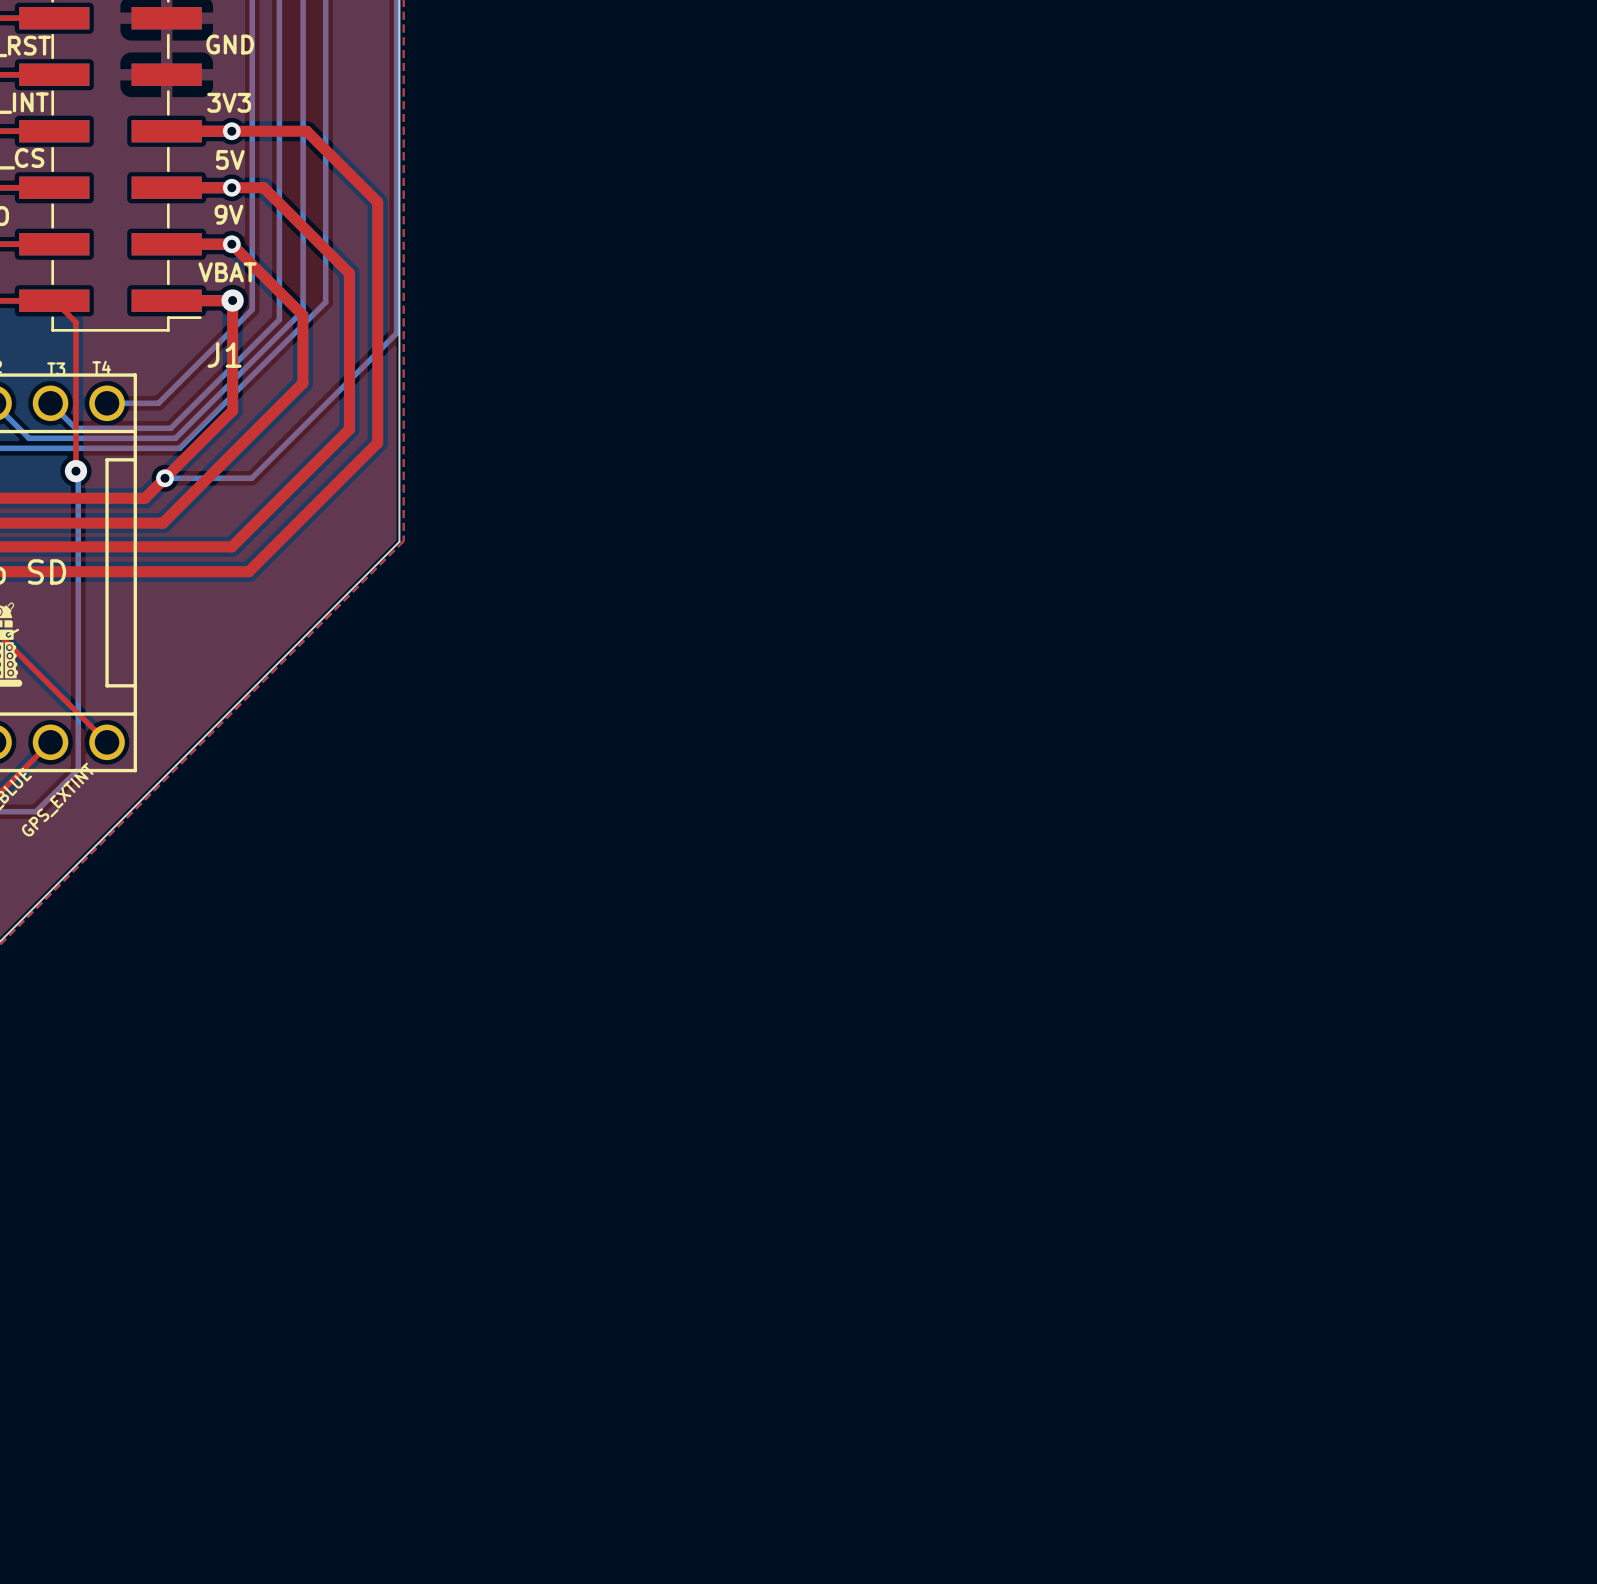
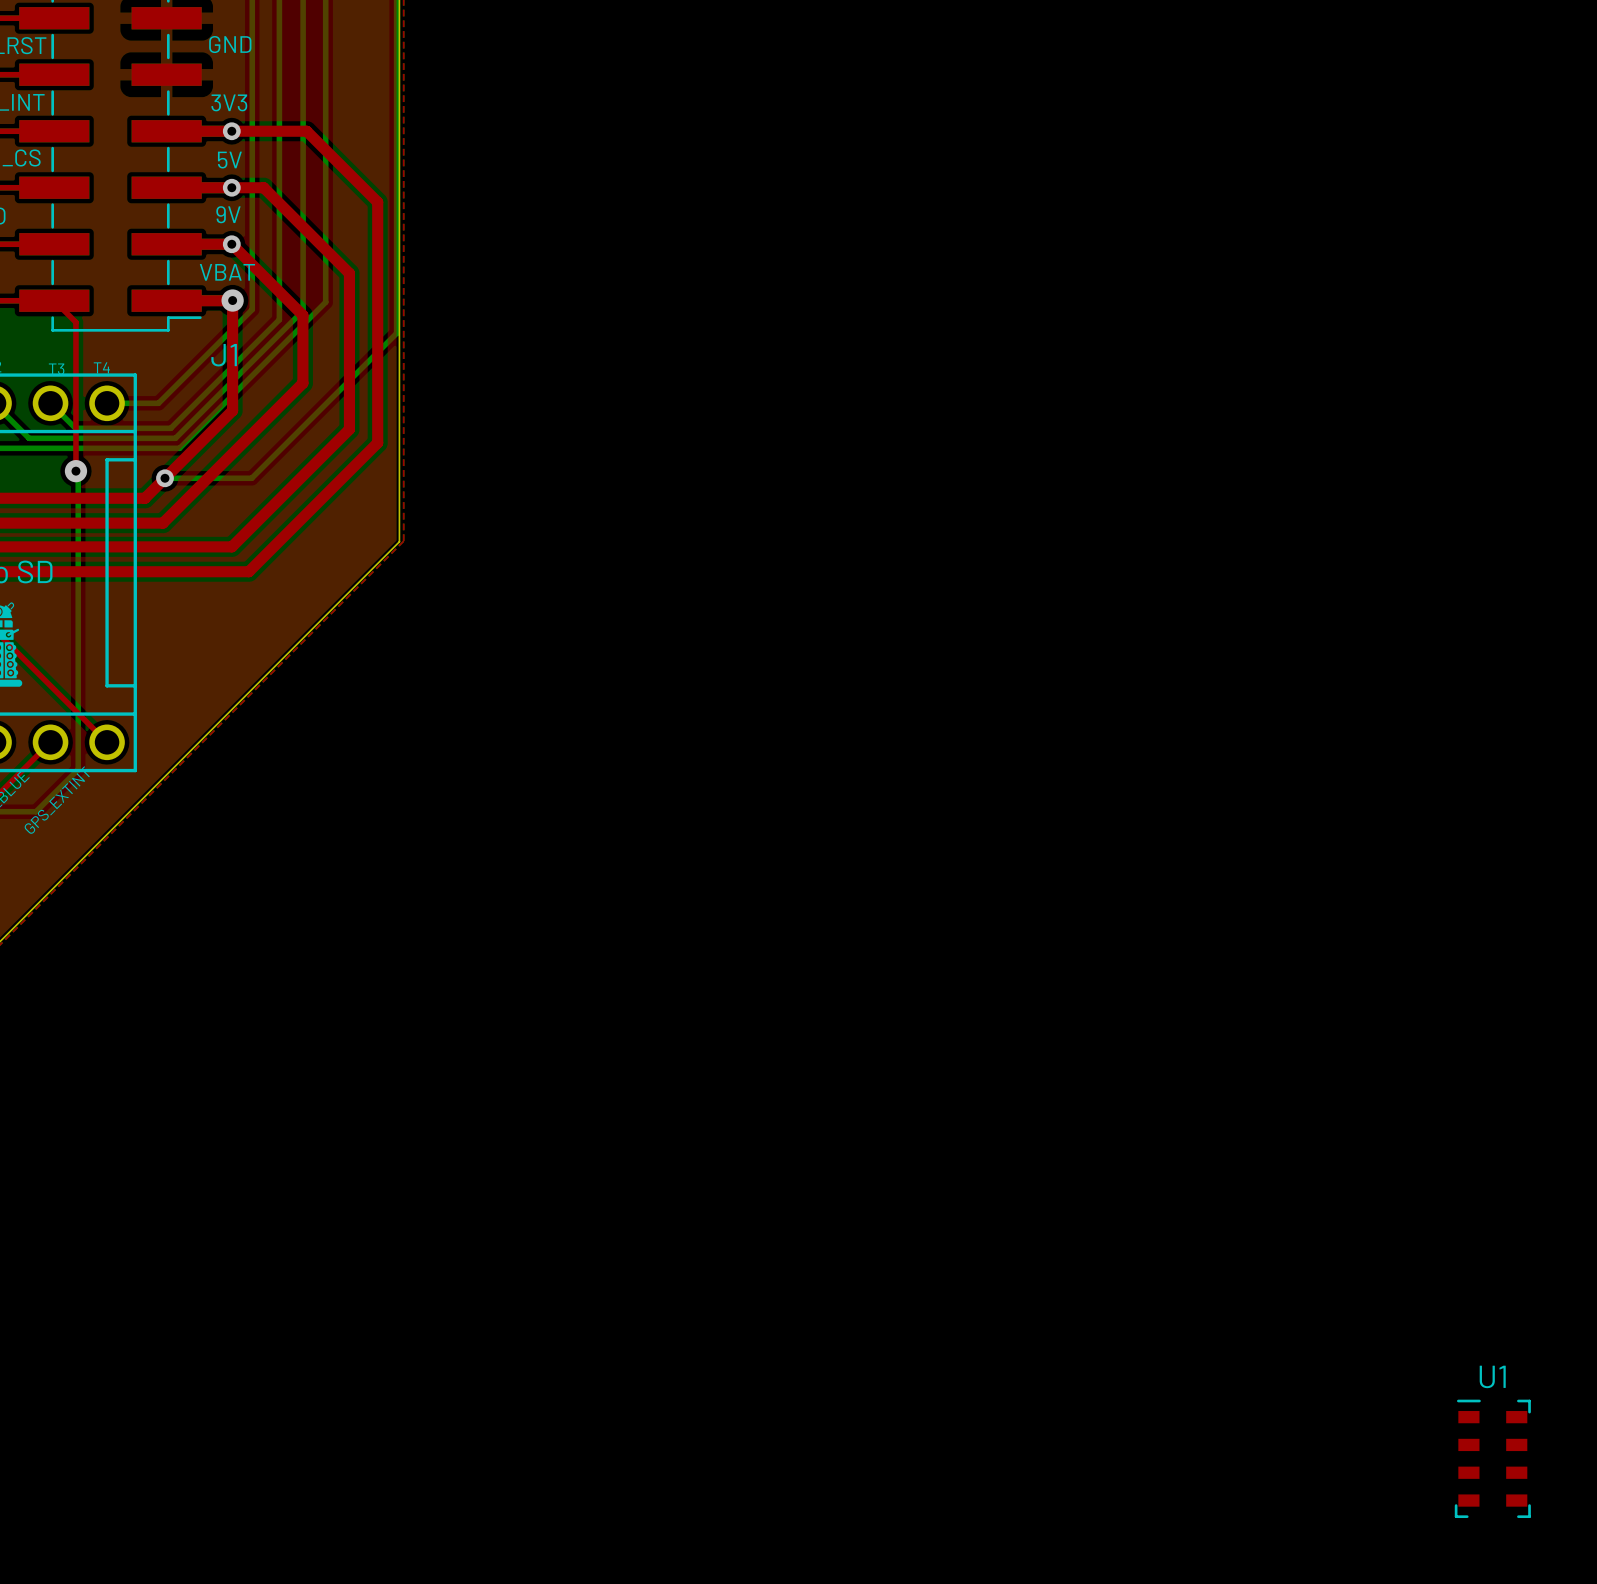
U1: none -> (1492, 1458)

